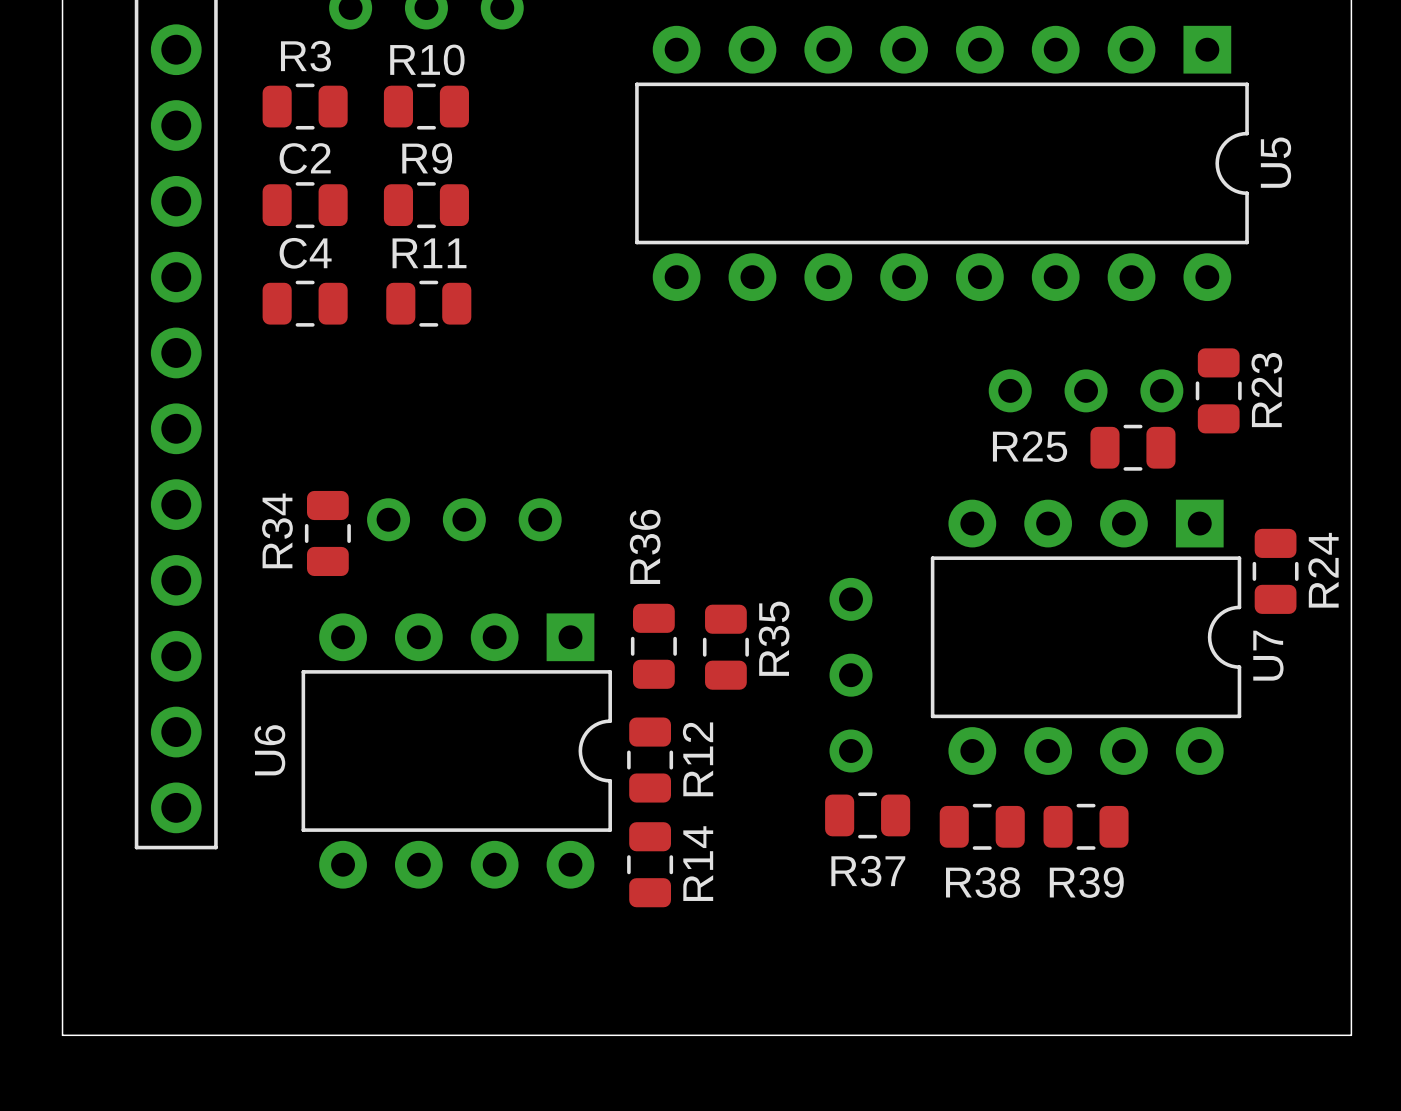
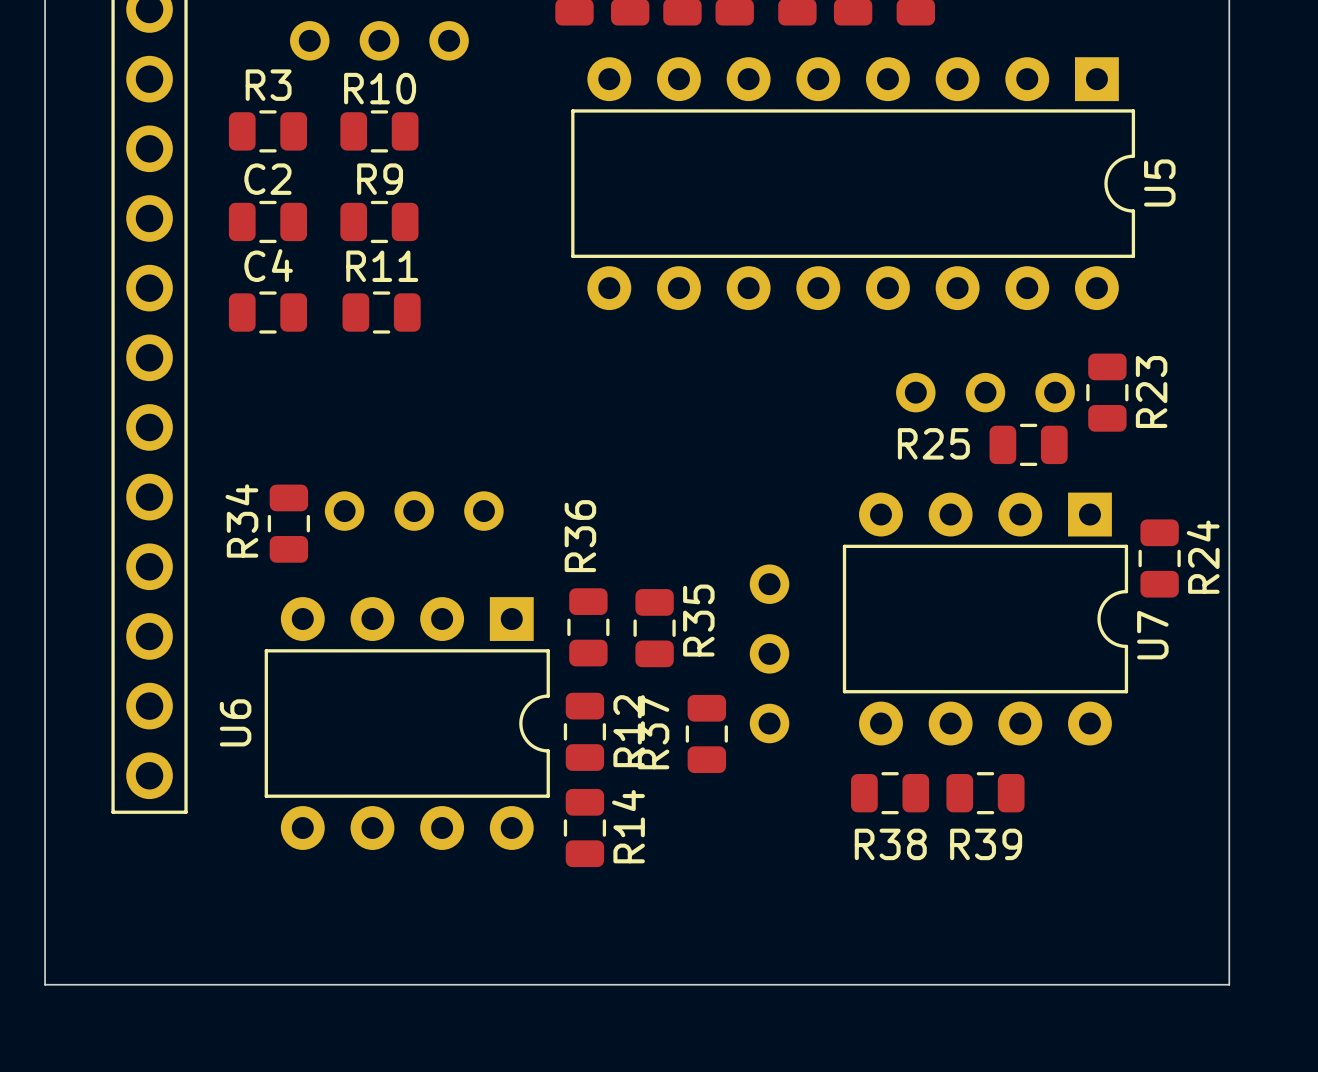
R37 rotation: 0° (867, 815) -> 90° clockwise (706, 733)
R37 position: (867, 815) -> (706, 733)

